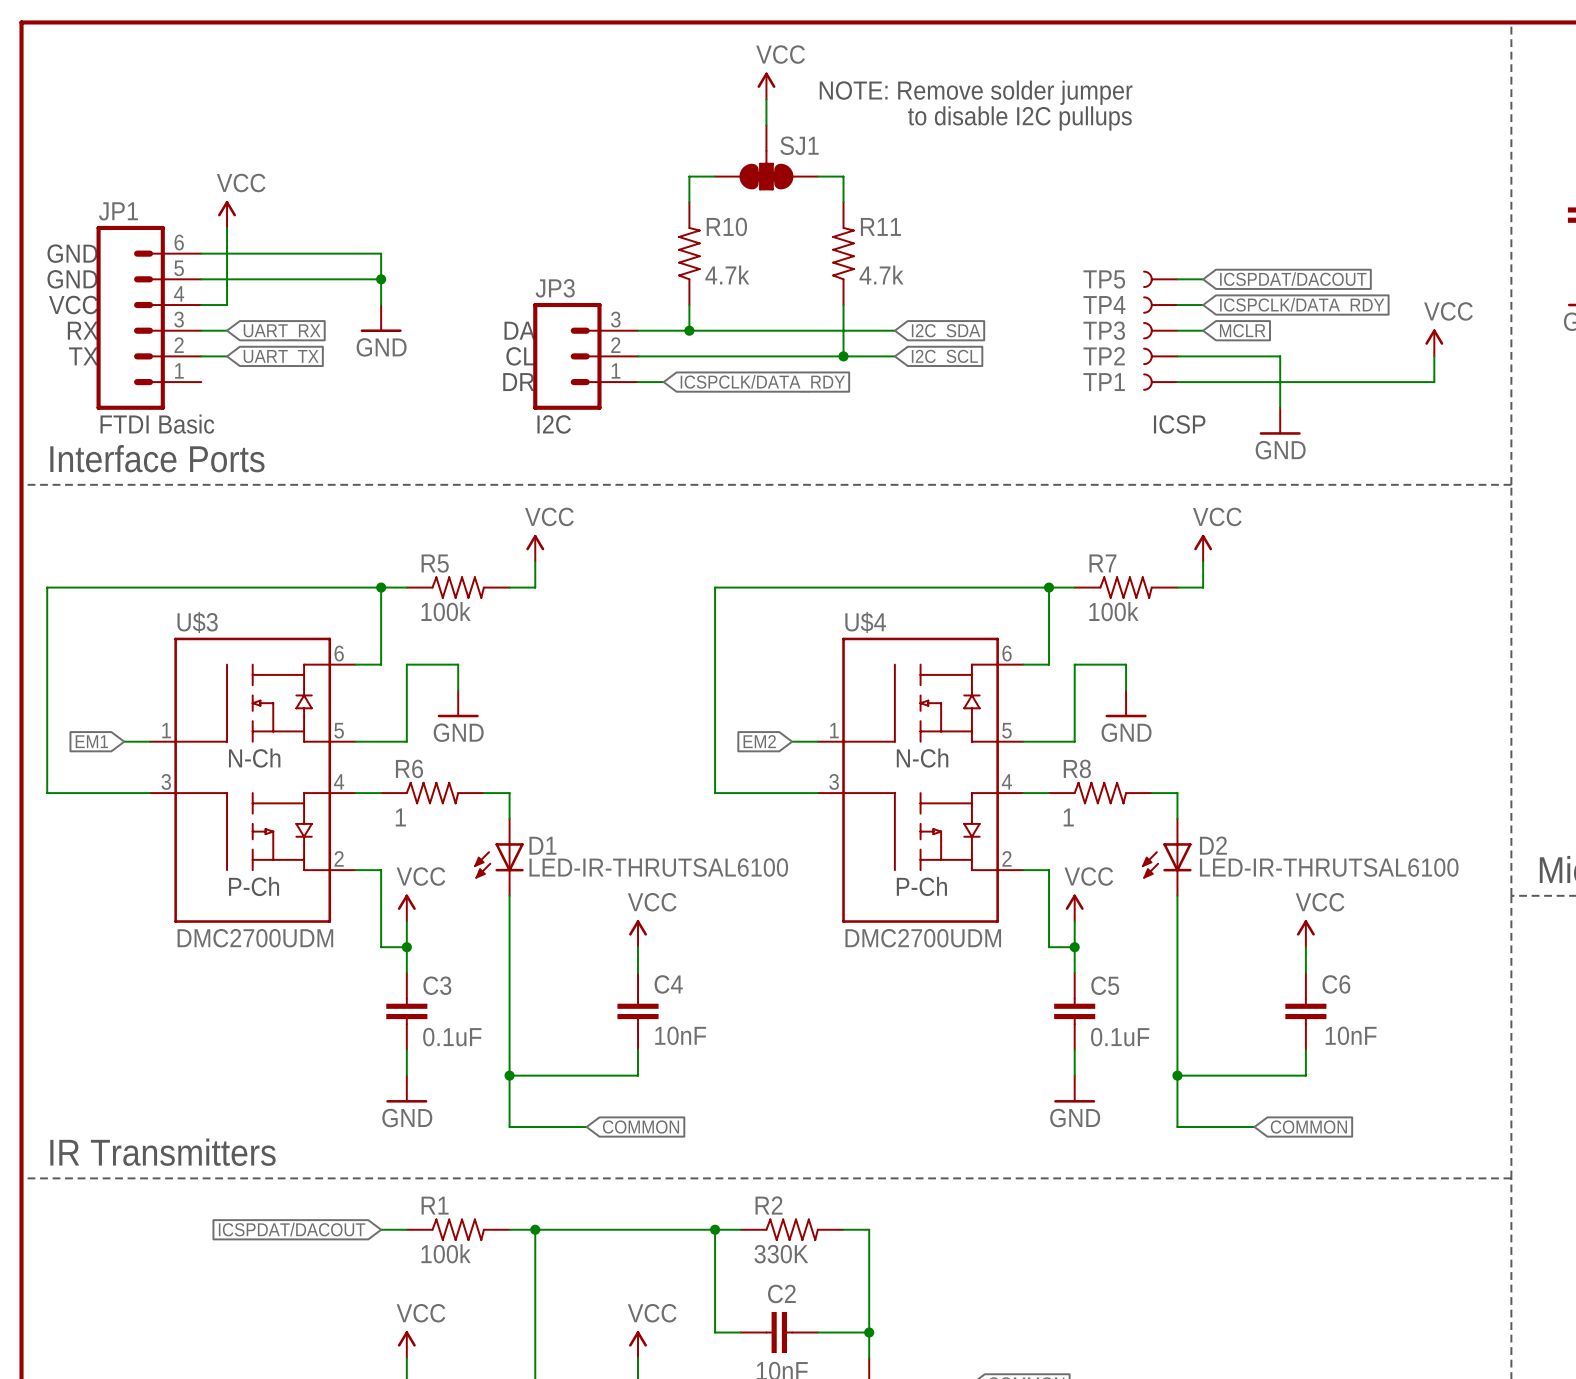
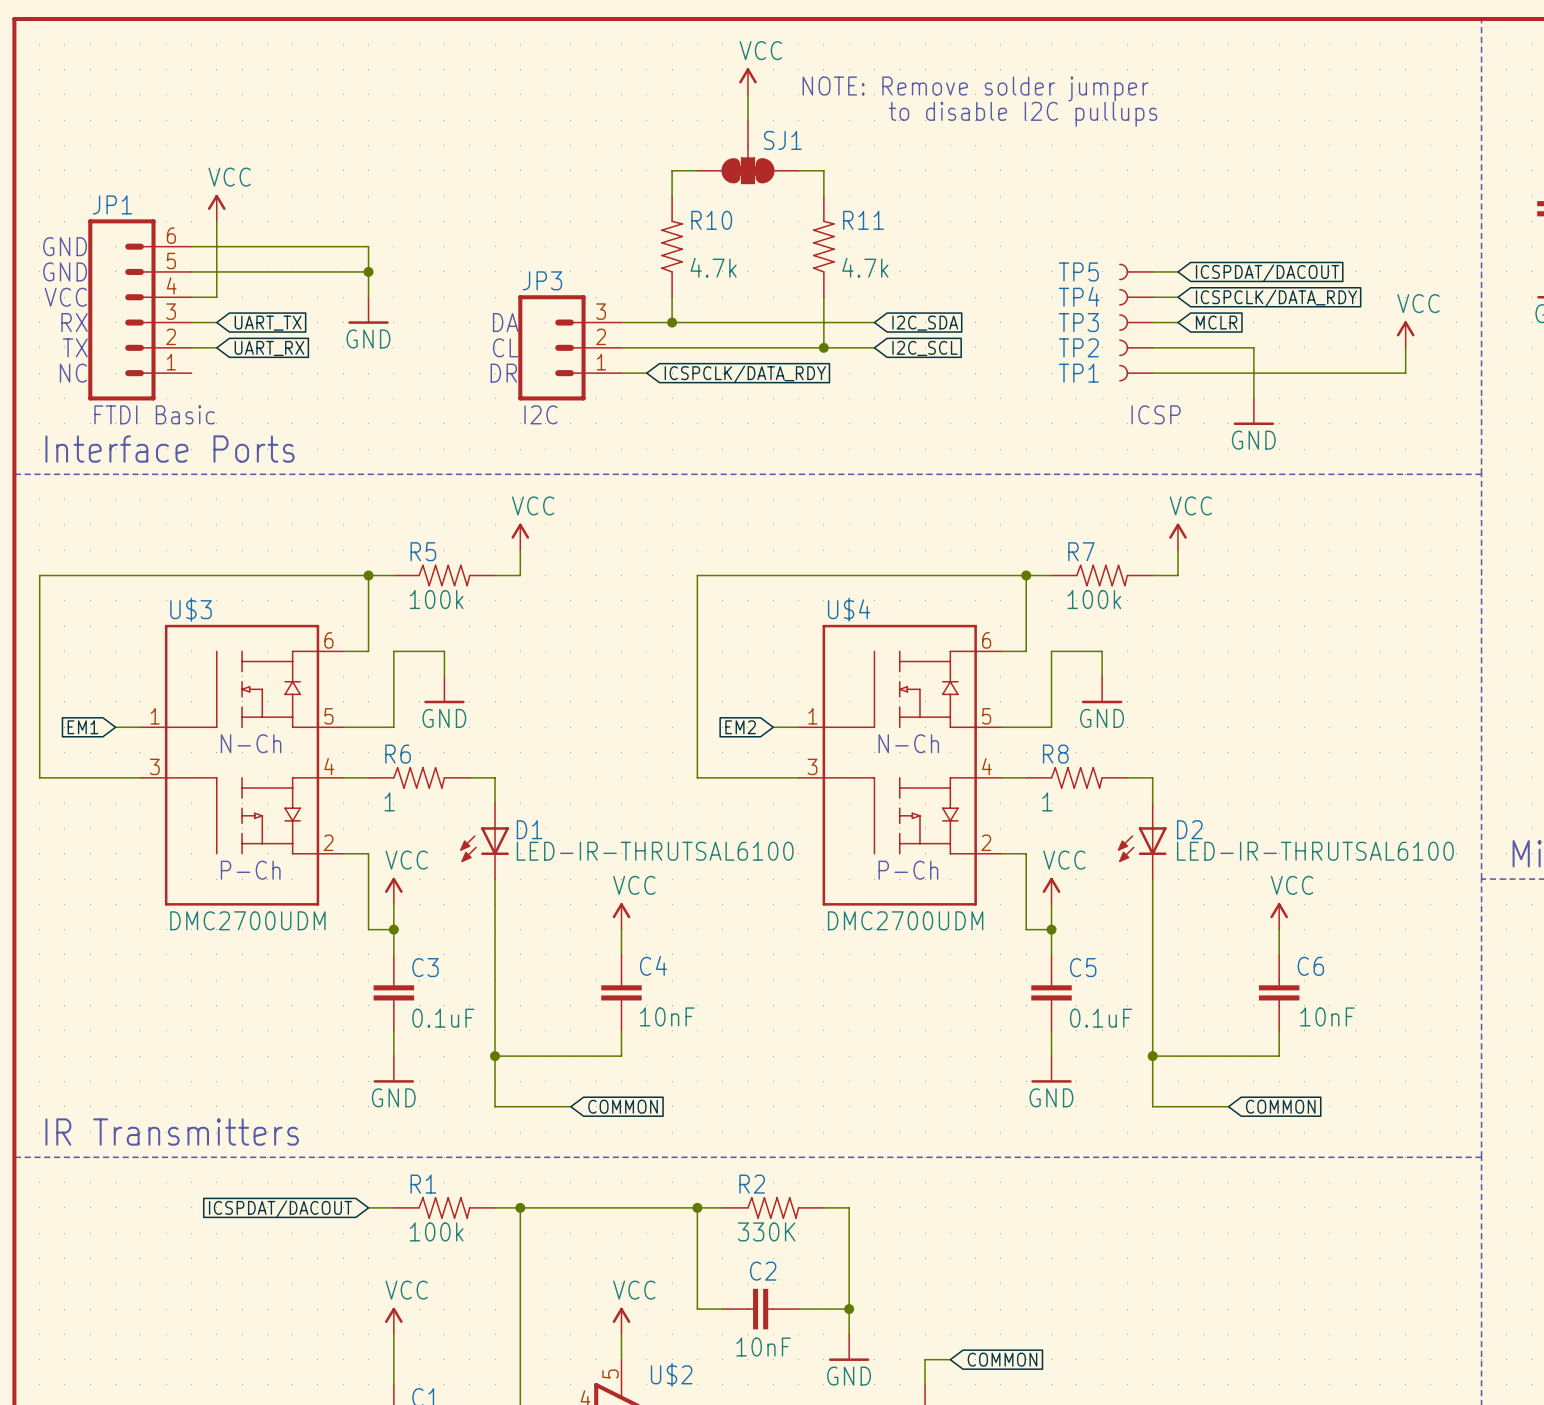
global label: UART_RX (282, 332) -> UART_TX (268, 323)
global label: UART_TX (281, 358) -> UART_RX (269, 348)
text: none -> NC (73, 373)

